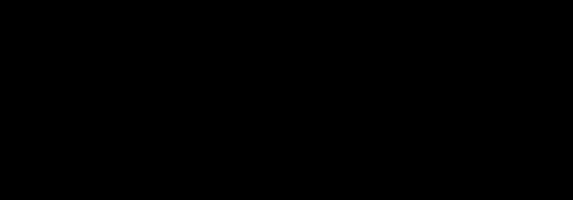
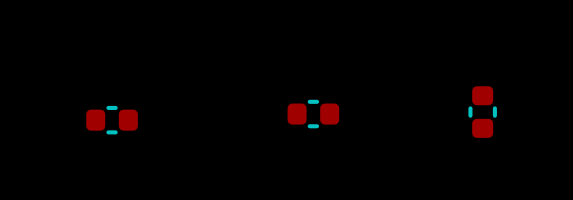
part: none -> (482, 112)
part: none -> (313, 114)
part: none -> (112, 120)

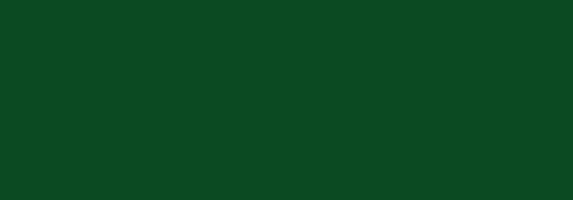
part: (482, 112) -> none
part: (313, 114) -> none
part: (112, 120) -> none

